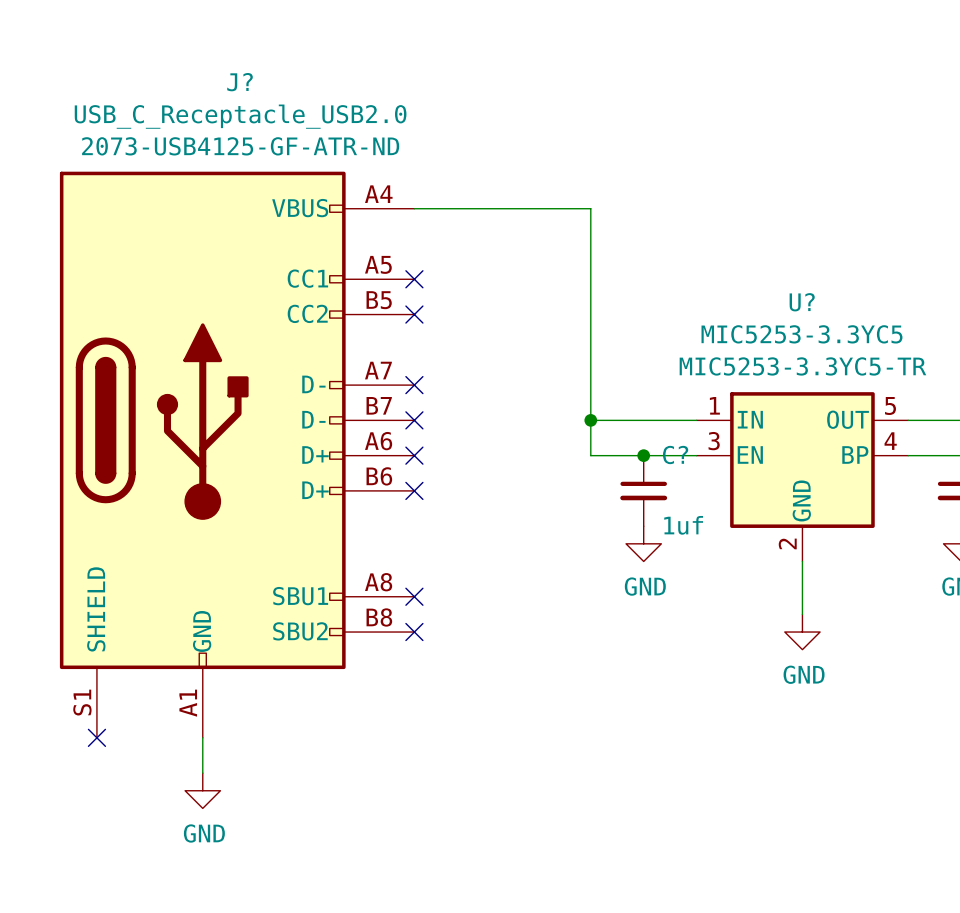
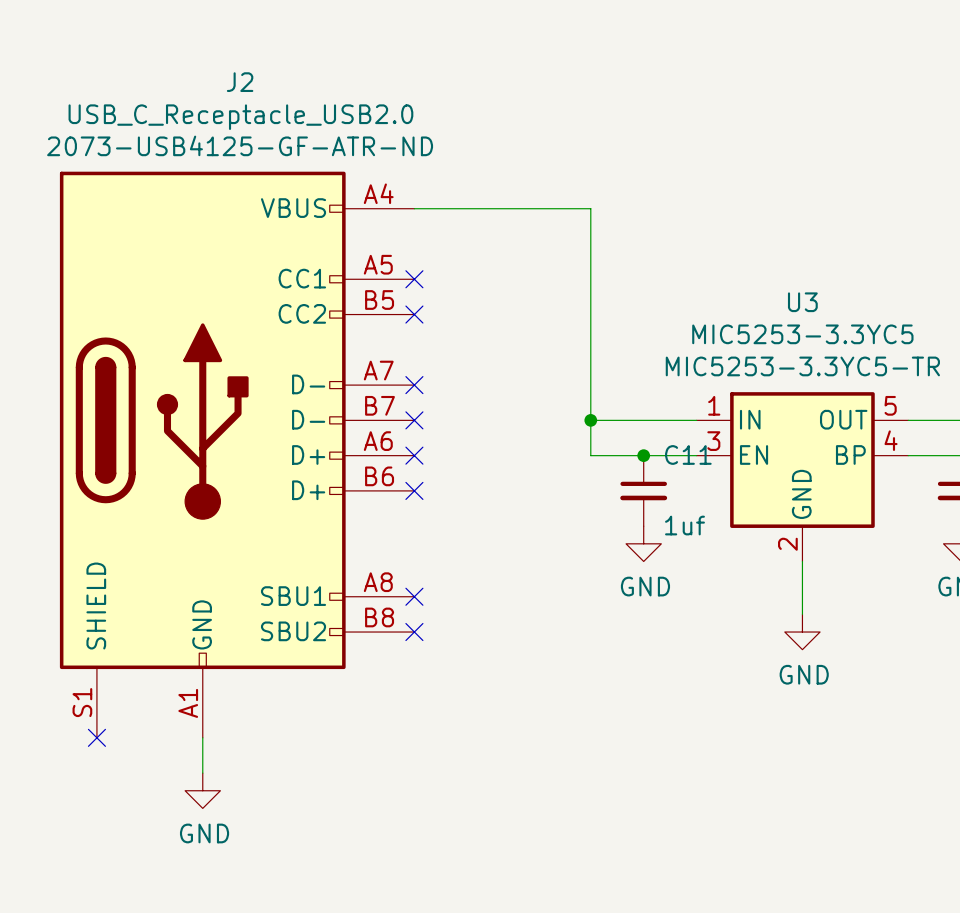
J? name: J? (240, 82) -> J2 (240, 82)
U? name: U? (802, 302) -> U3 (802, 302)
C? name: C? (675, 455) -> C11 (688, 454)

